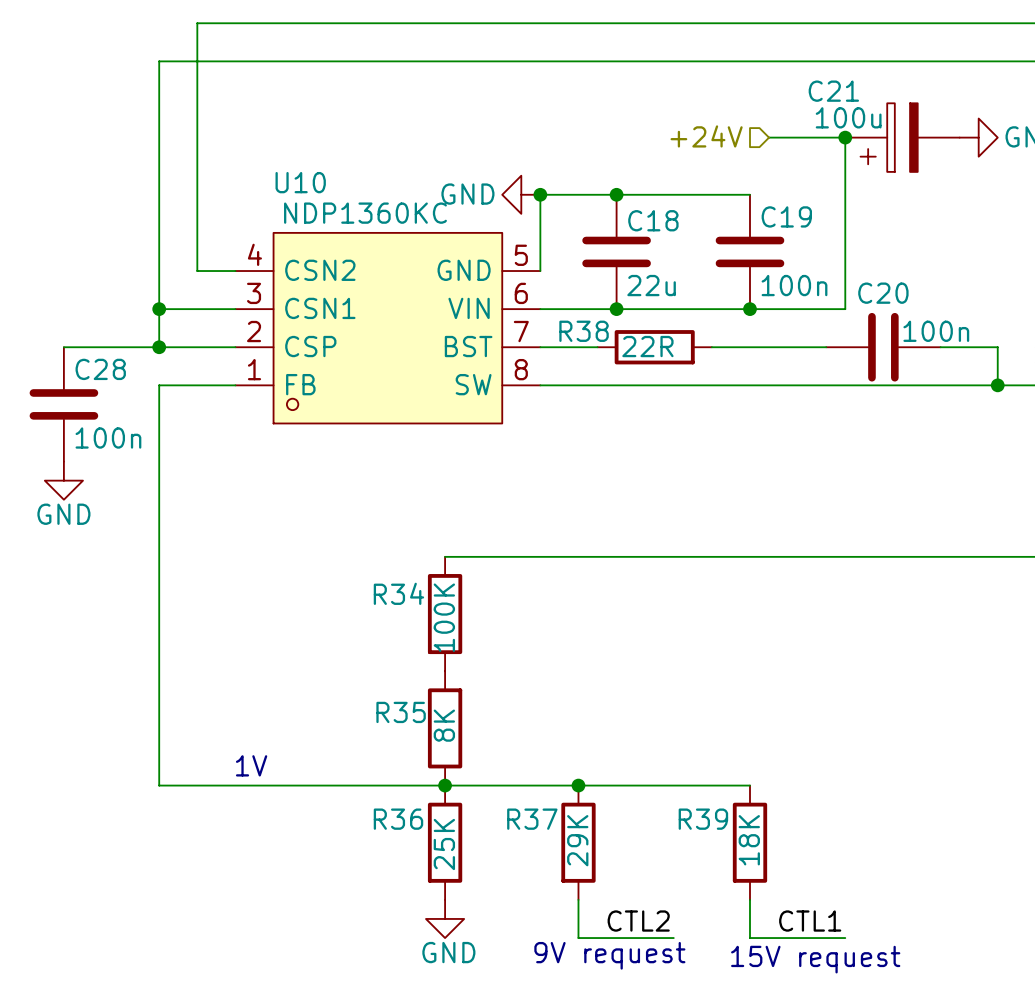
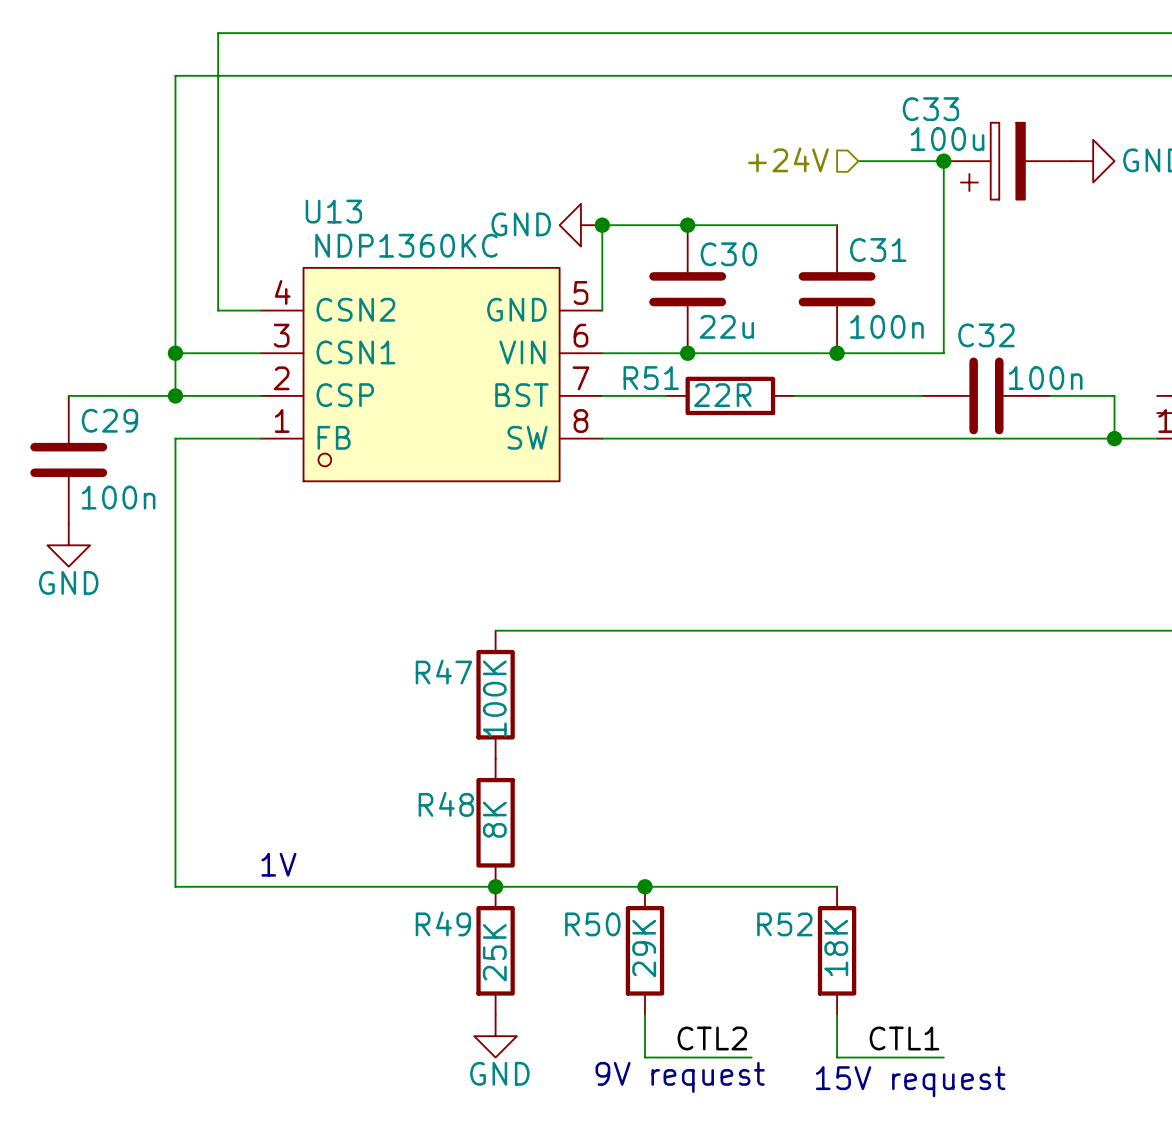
C21 name: C21 (833, 91) -> C33 (930, 109)
U10 name: U10 (300, 182) -> U13 (333, 211)
C19 name: C19 (786, 216) -> C31 (878, 250)
C18 name: C18 (653, 220) -> C30 (728, 254)
C20 name: C20 (883, 293) -> C32 (986, 335)
R38 name: R38 (584, 331) -> R51 (651, 378)
C28 name: C28 (100, 369) -> C29 (109, 420)
R34 name: R34 (398, 593) -> R47 (443, 672)
R35 name: R35 (401, 712) -> R48 (446, 804)
R36 name: R36 (398, 819) -> R49 (443, 923)
R37 name: R37 (532, 819) -> R50 (592, 924)
R39 name: R39 (703, 819) -> R52 (784, 924)

